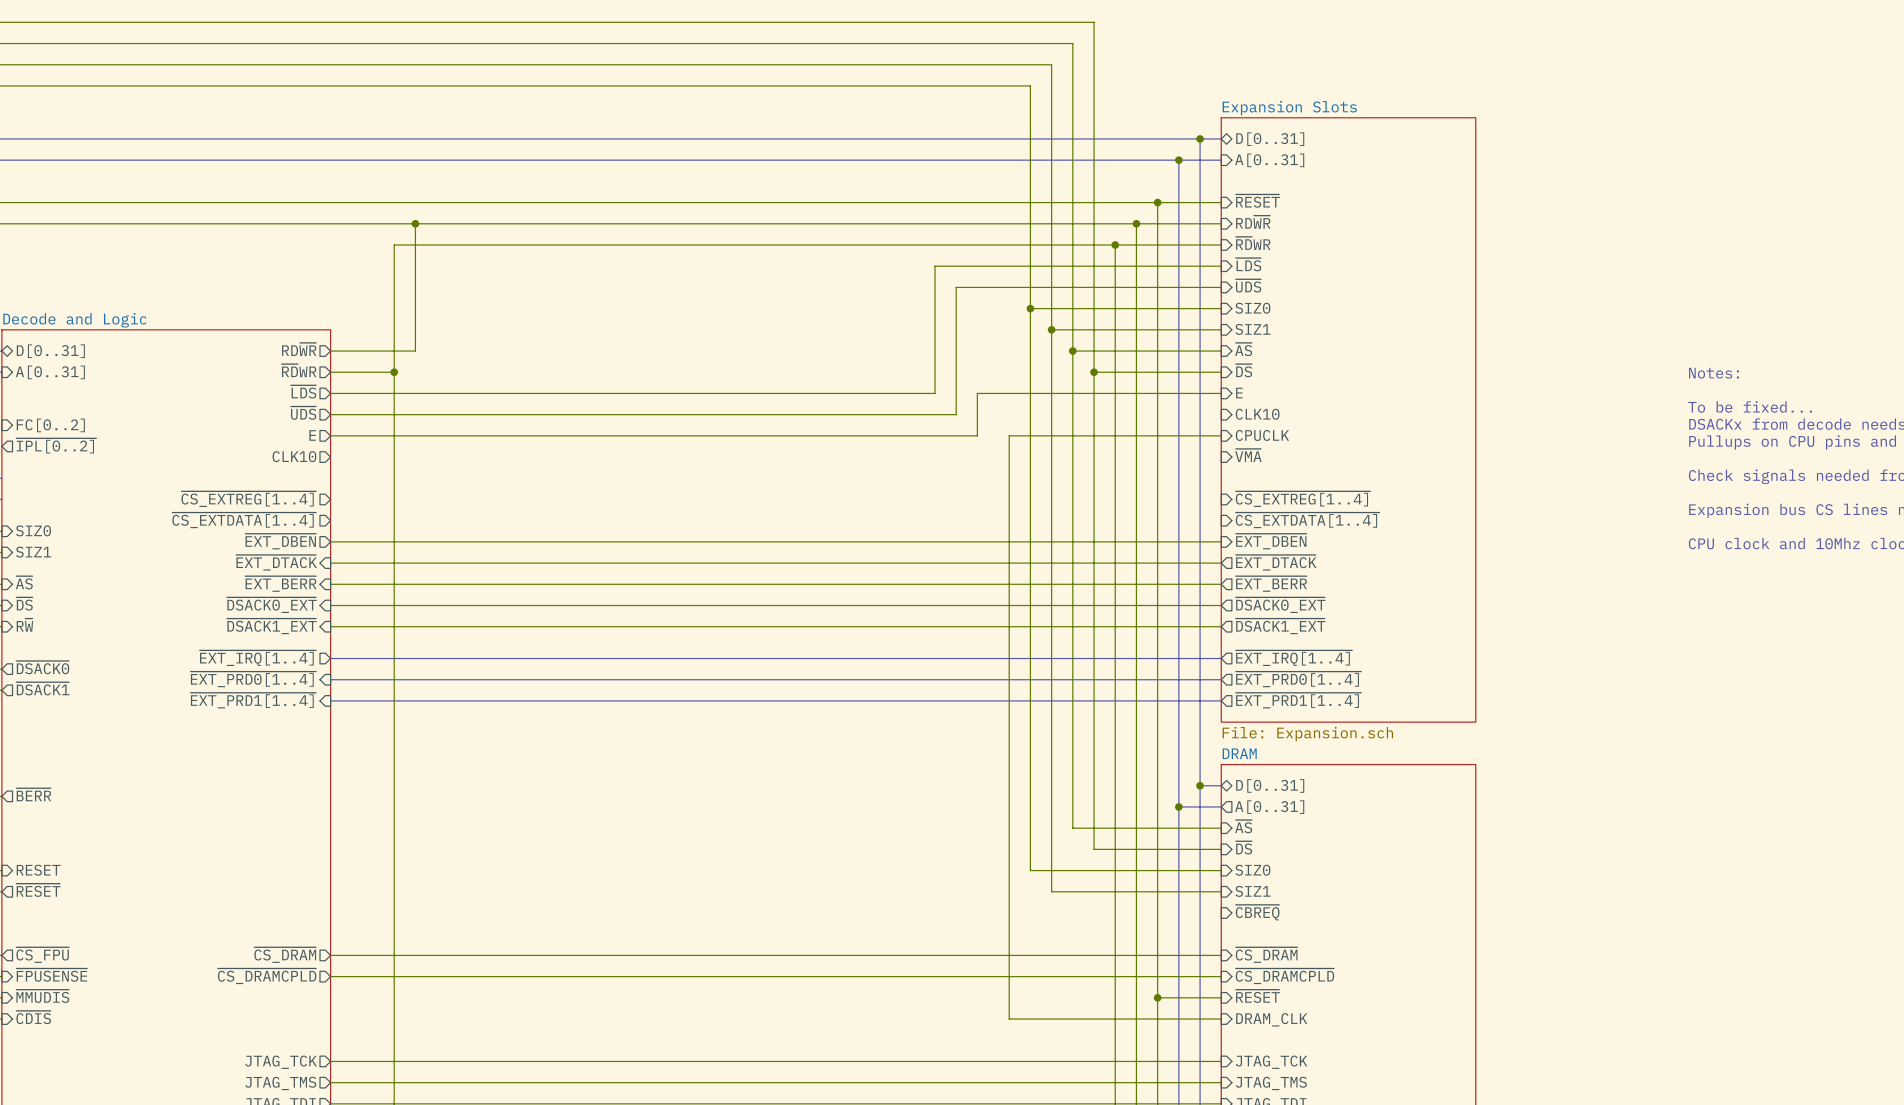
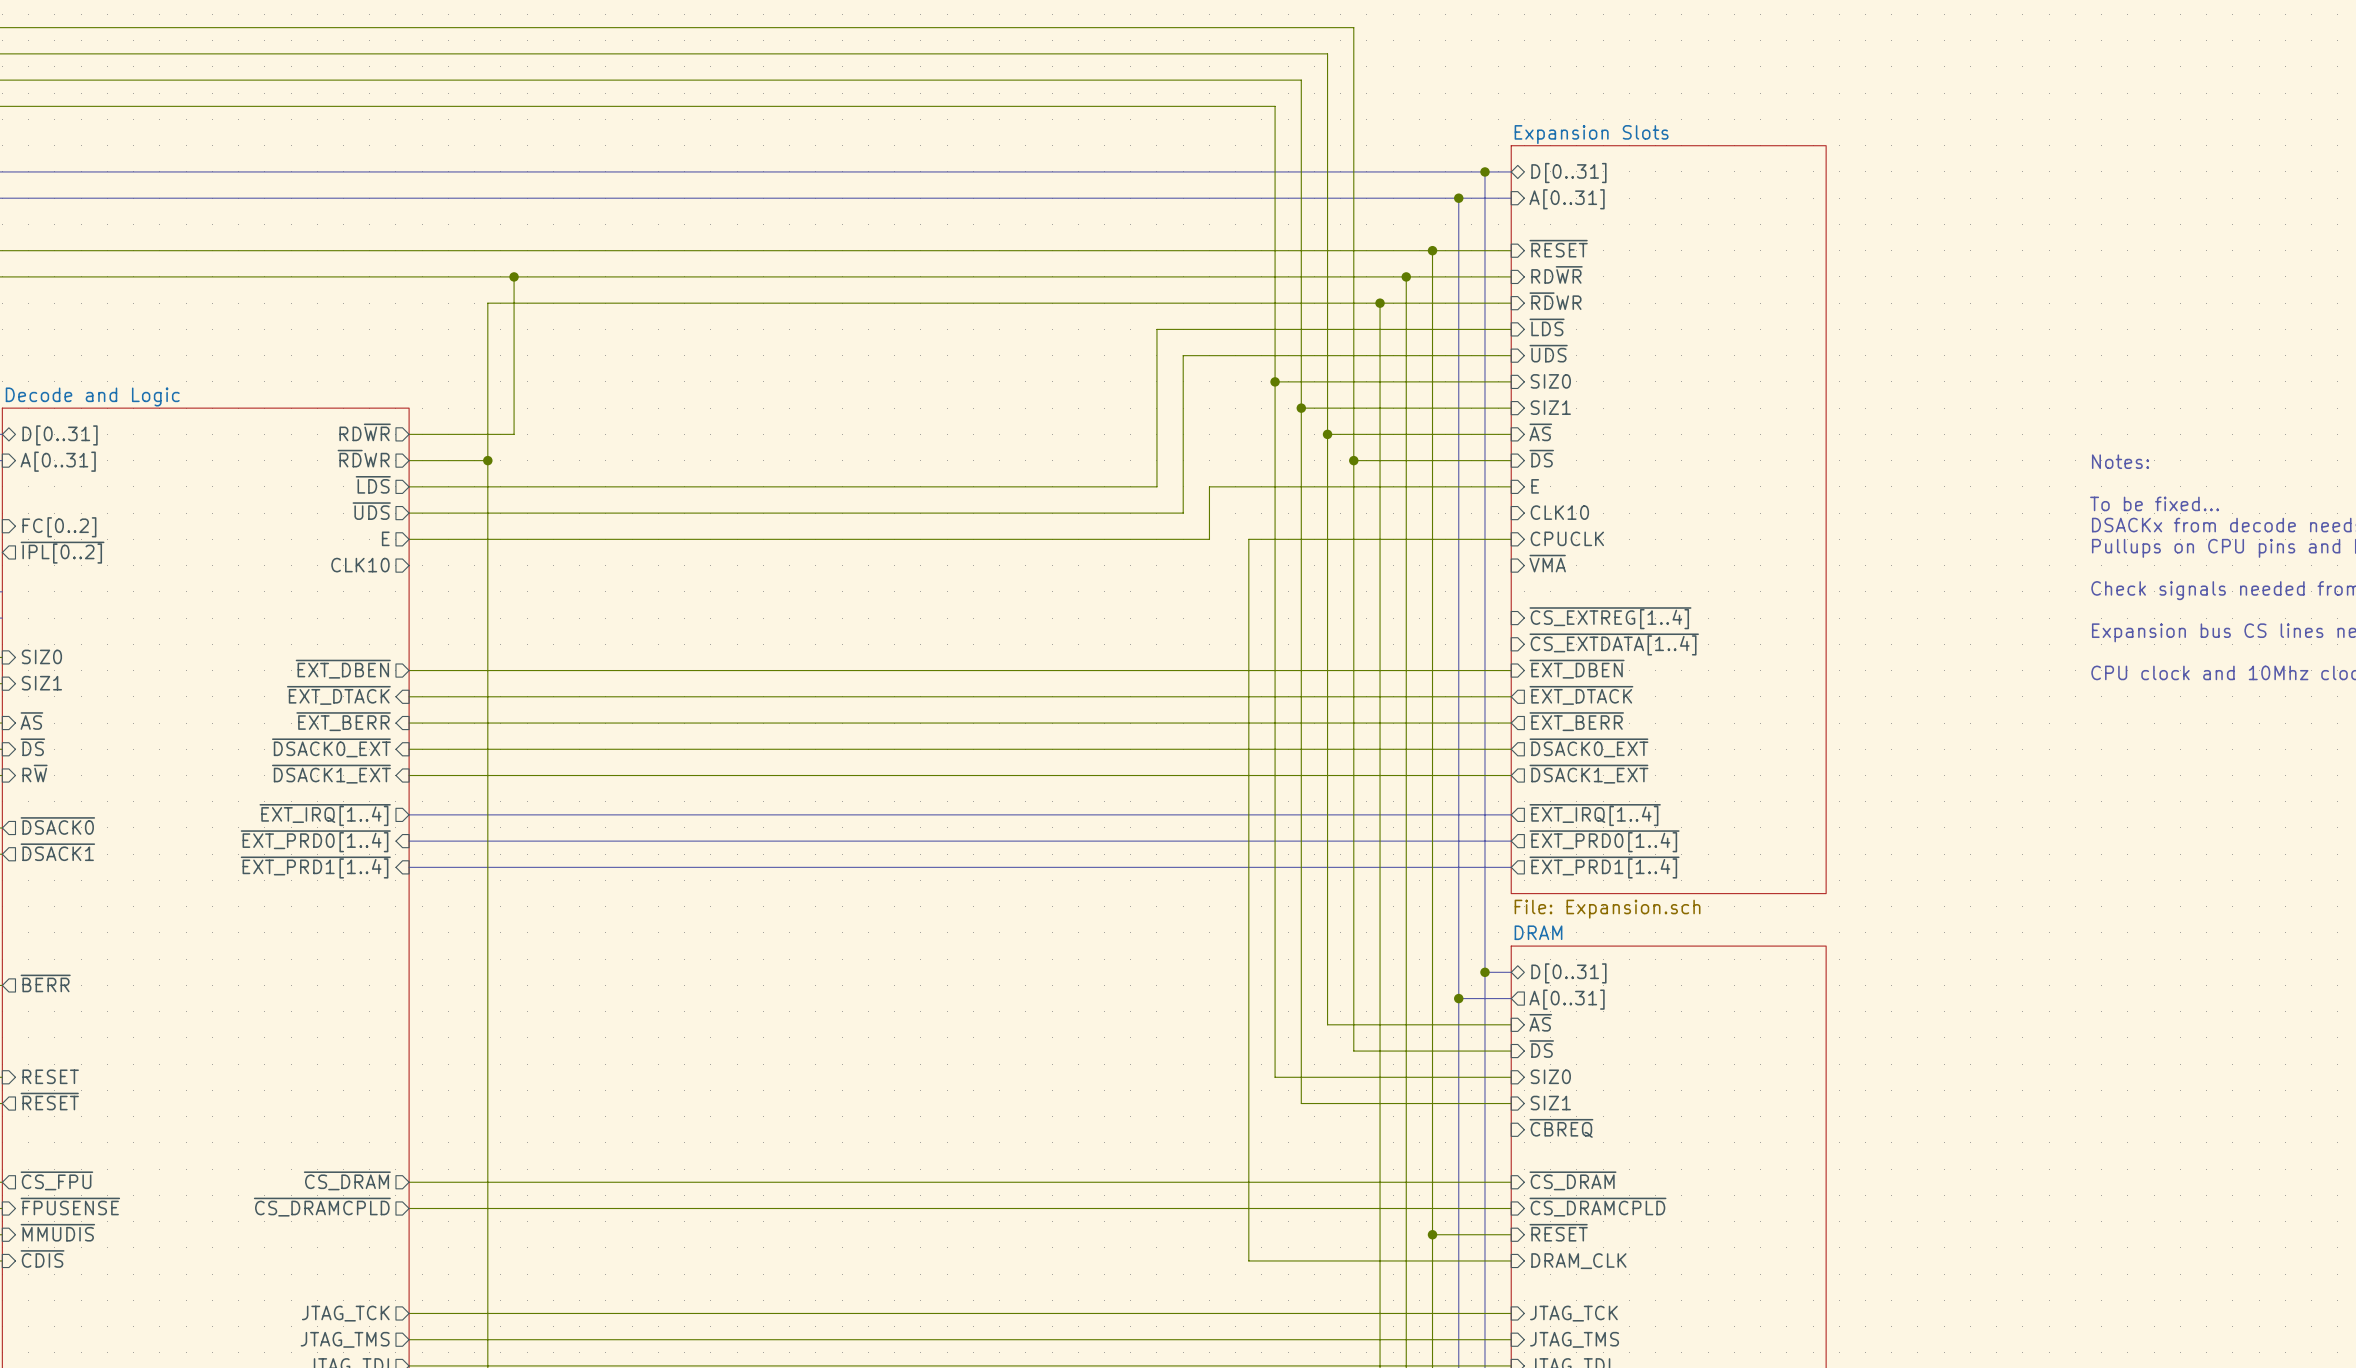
sheet pin: ~{CS_EXTREG[1..4]} (248, 499) -> none
sheet pin: ~{CS_EXTDATA[1..4]} (244, 520) -> none

